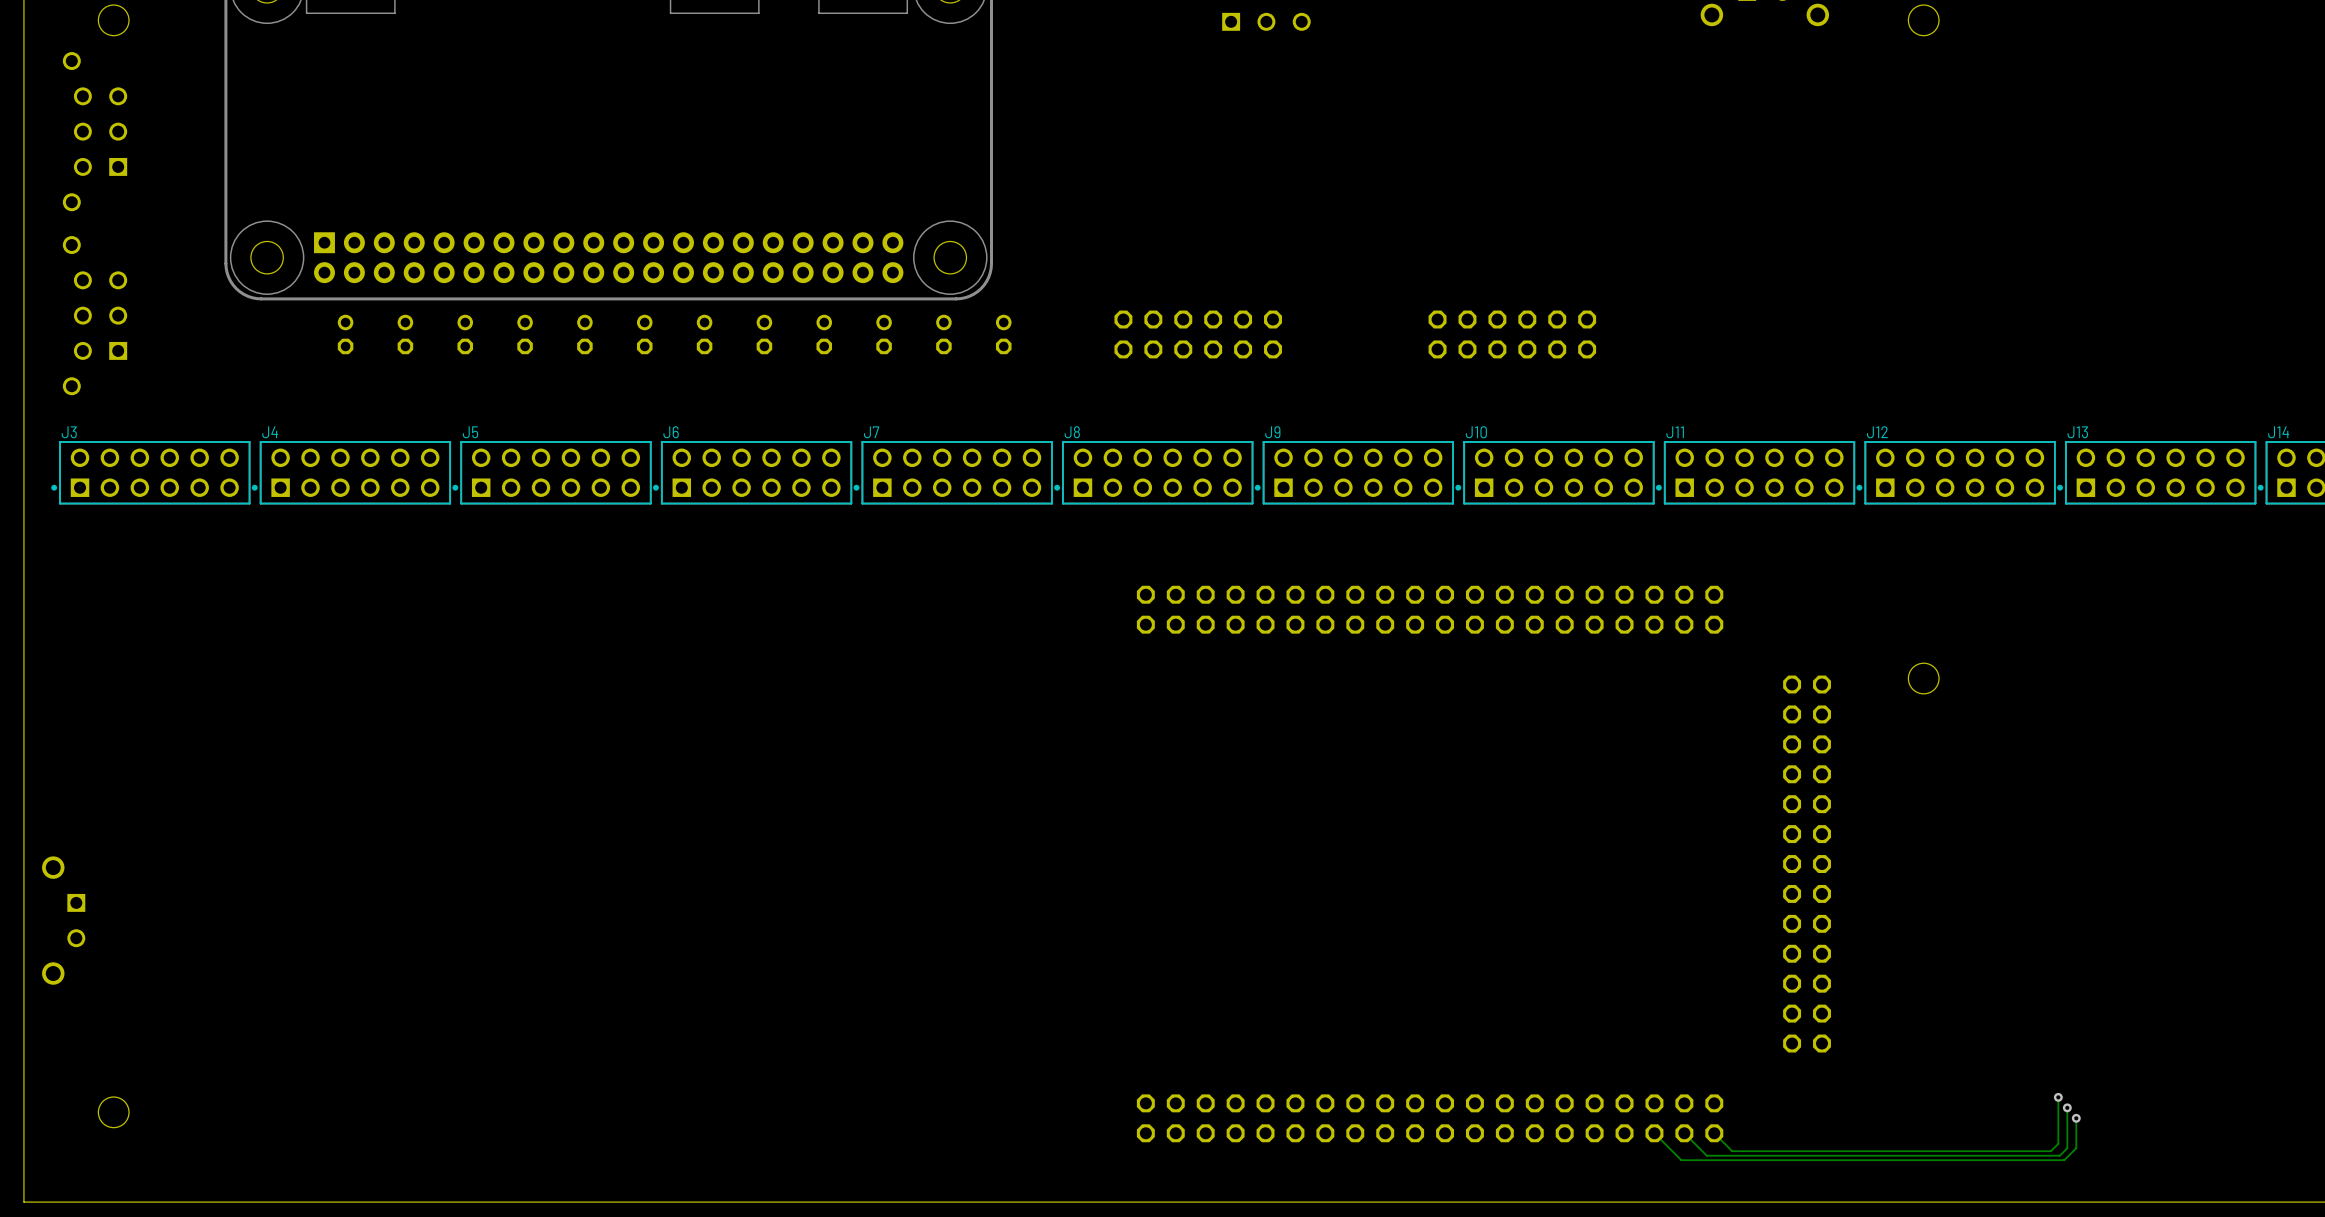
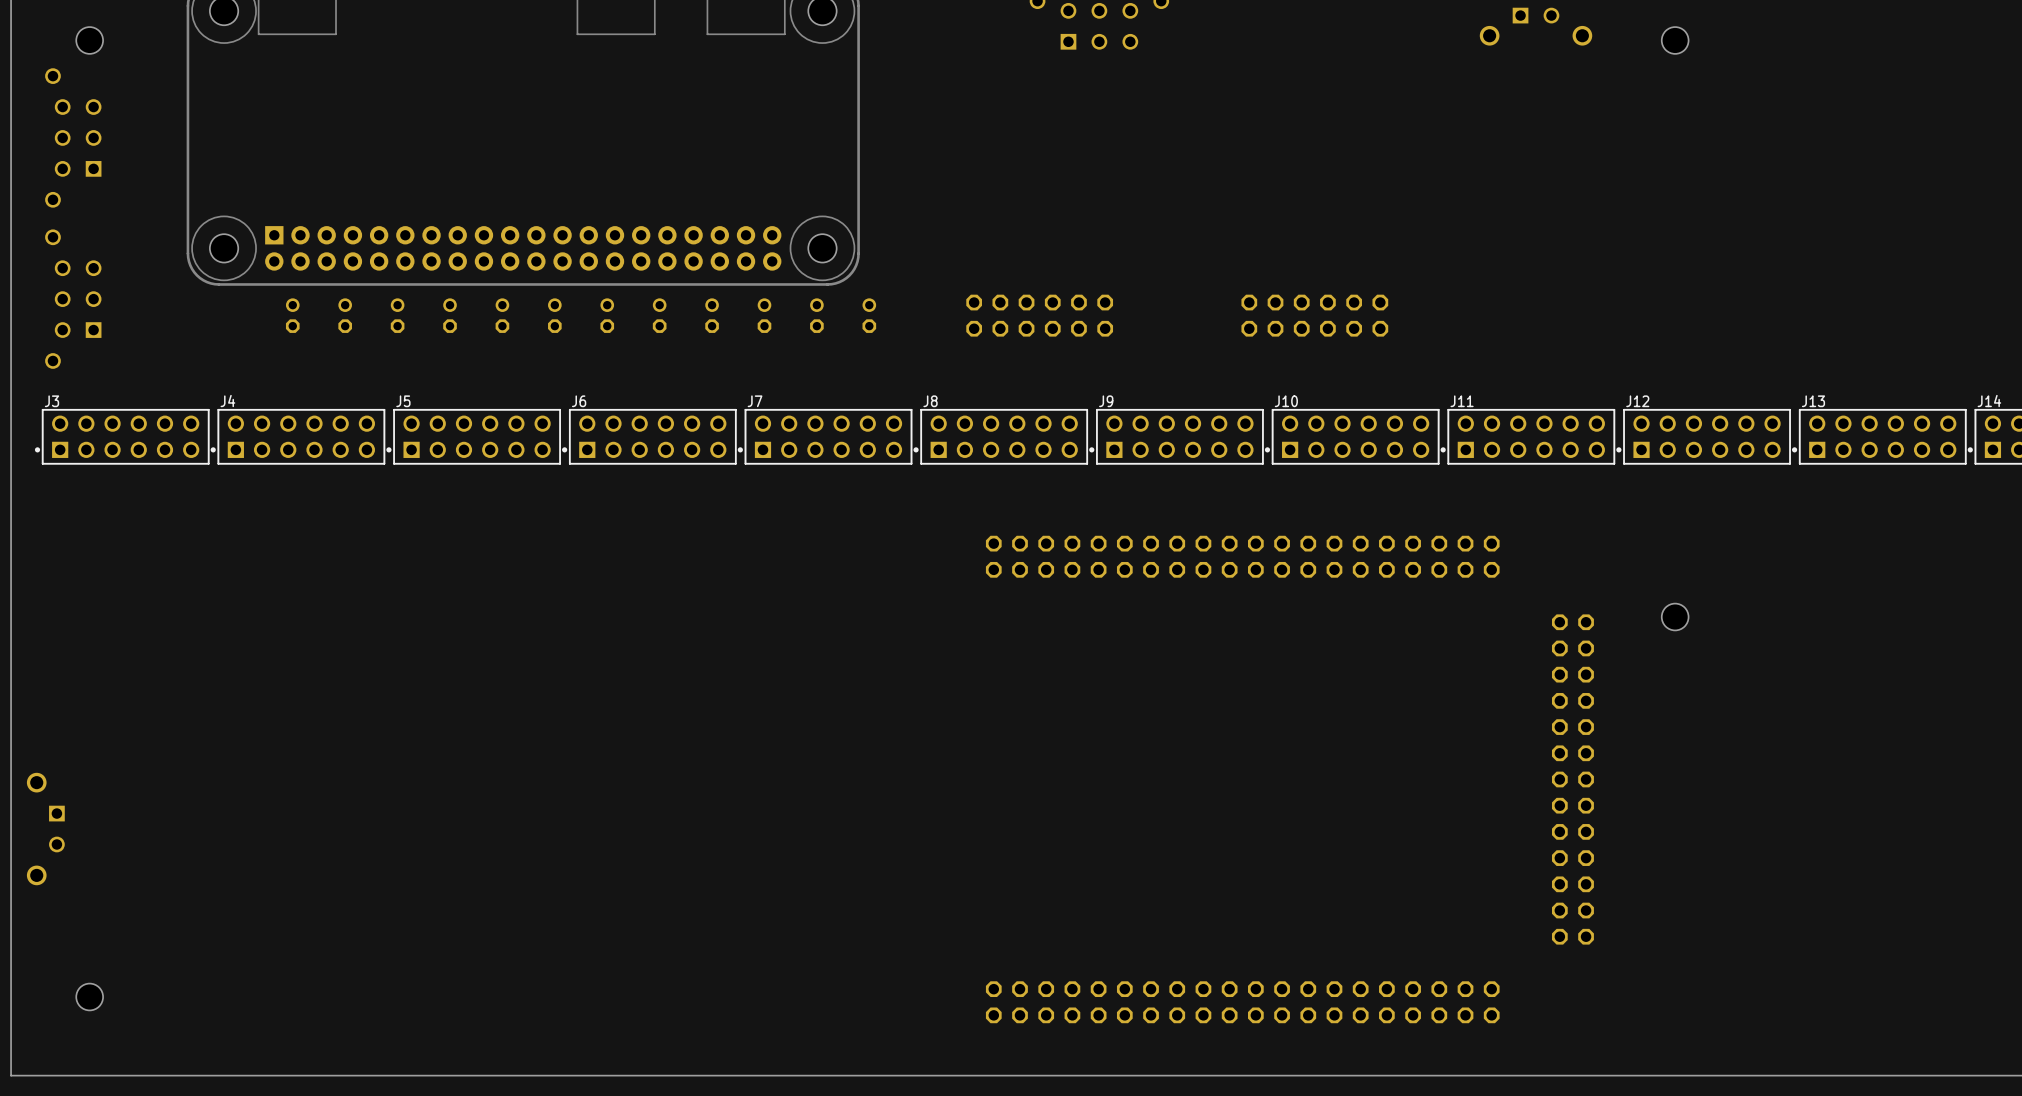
track: (2058, 1097) (2058, 1143) (2050, 1151) (1732, 1151) (1714, 1133) -> none
via: (2058, 1097) -> none
track: (2067, 1107) (2067, 1148) (2059, 1155) (1706, 1155) (1684, 1133) -> none
via: (2067, 1107) -> none
track: (2076, 1118) (2076, 1148) (2064, 1160) (1681, 1160) (1654, 1133) -> none
via: (2076, 1118) -> none

